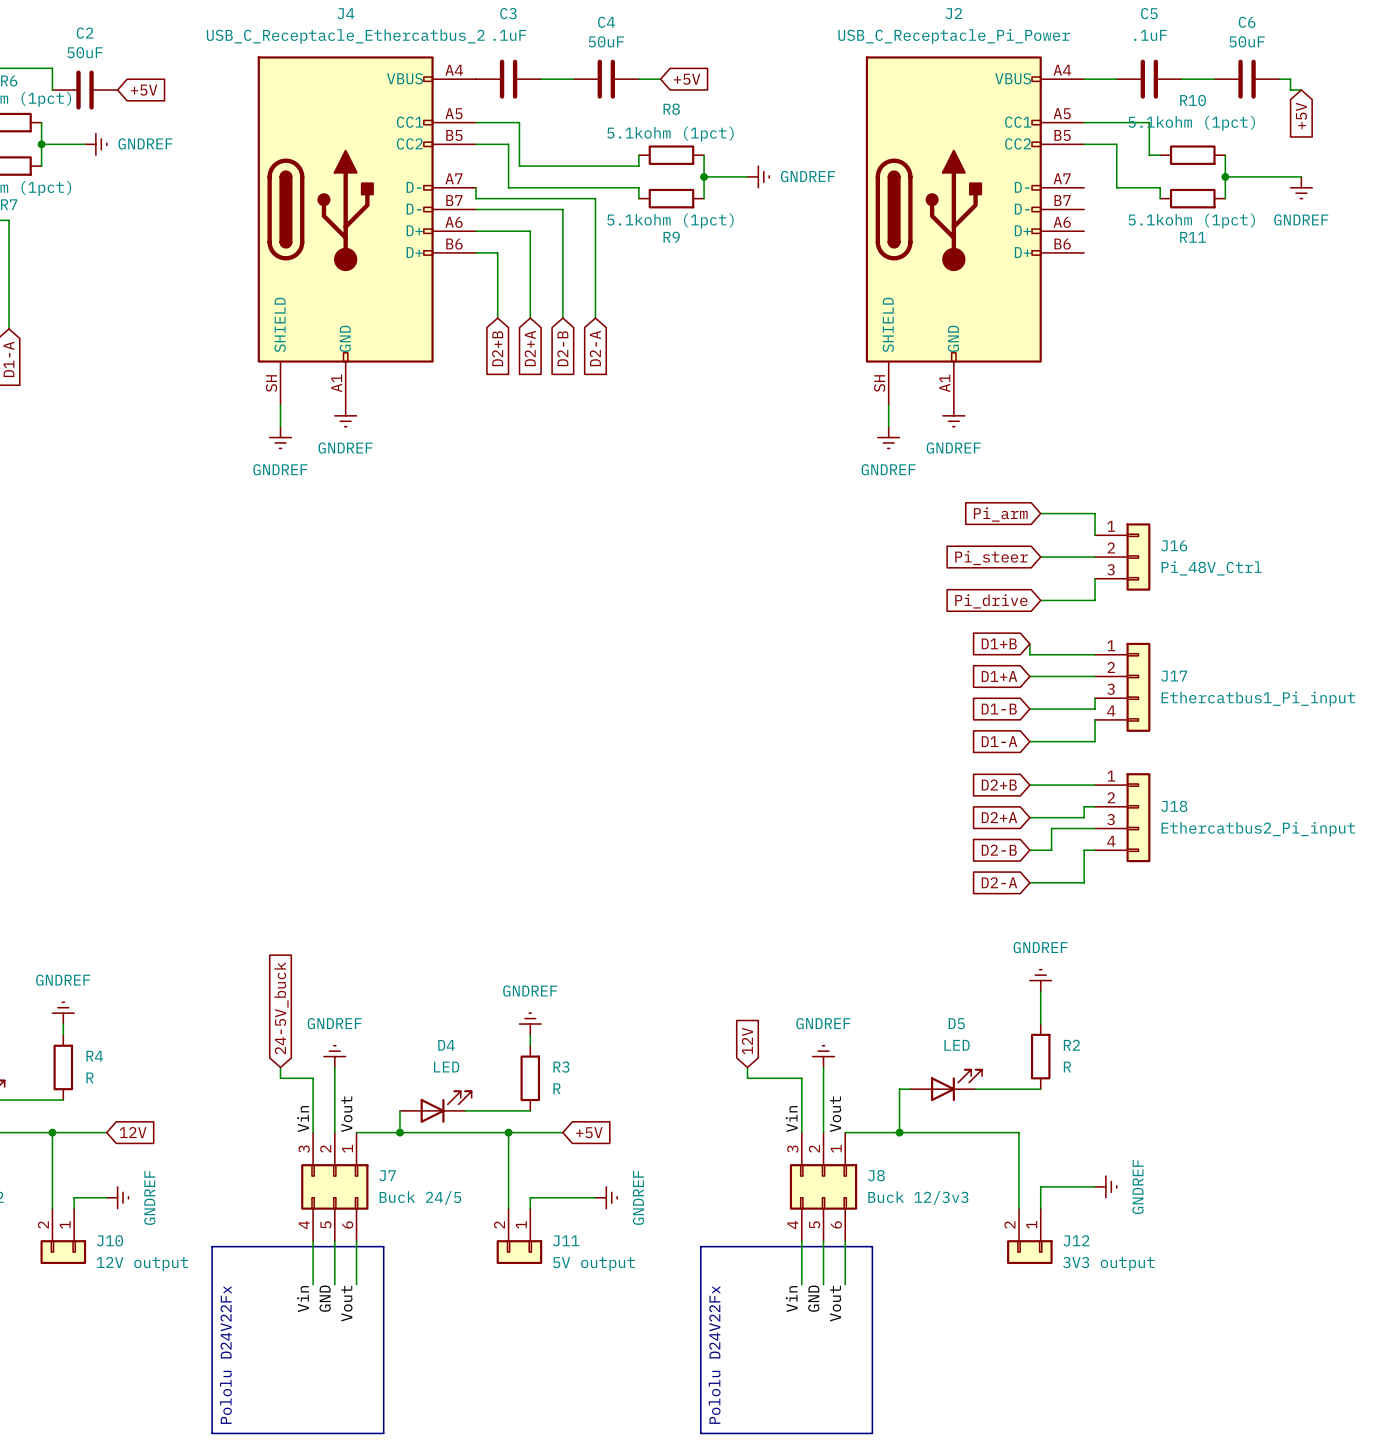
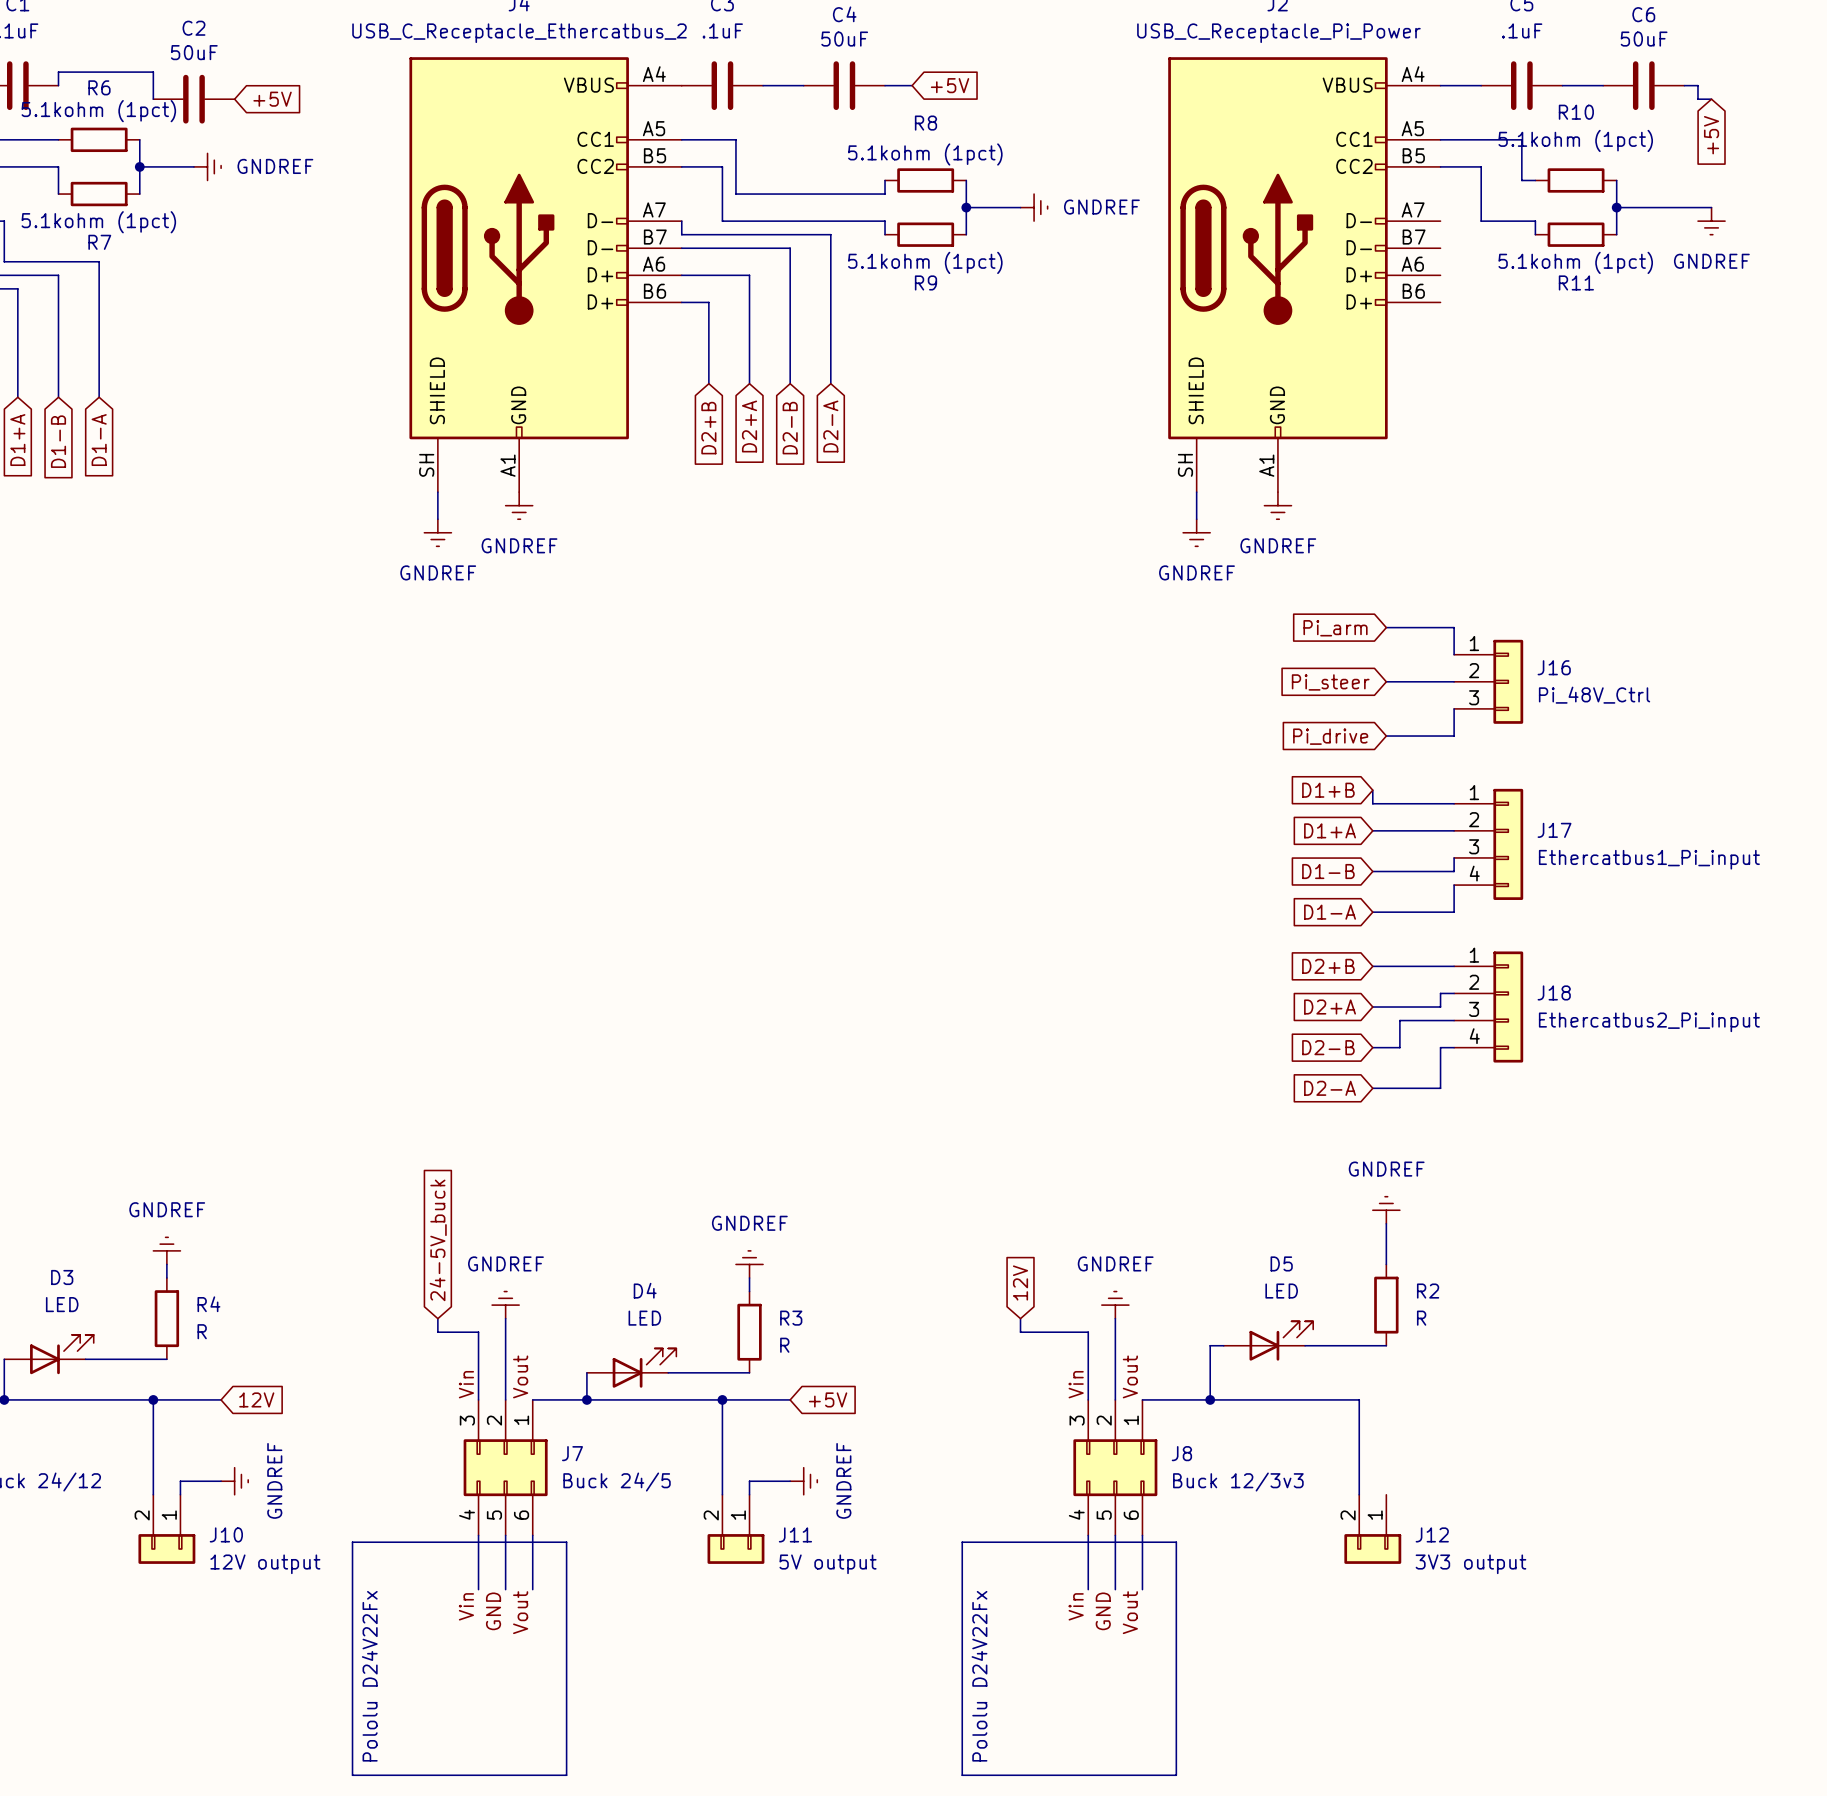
wire: (1095, 1186) (1040, 1186) (1040, 1208) -> none
power symbol: GNDREF (1105, 1186) -> none
wire: (562, 1197) (595, 1197) -> none
power symbol position: GNDREF (606, 1197) -> GNDREF (803, 1481)

